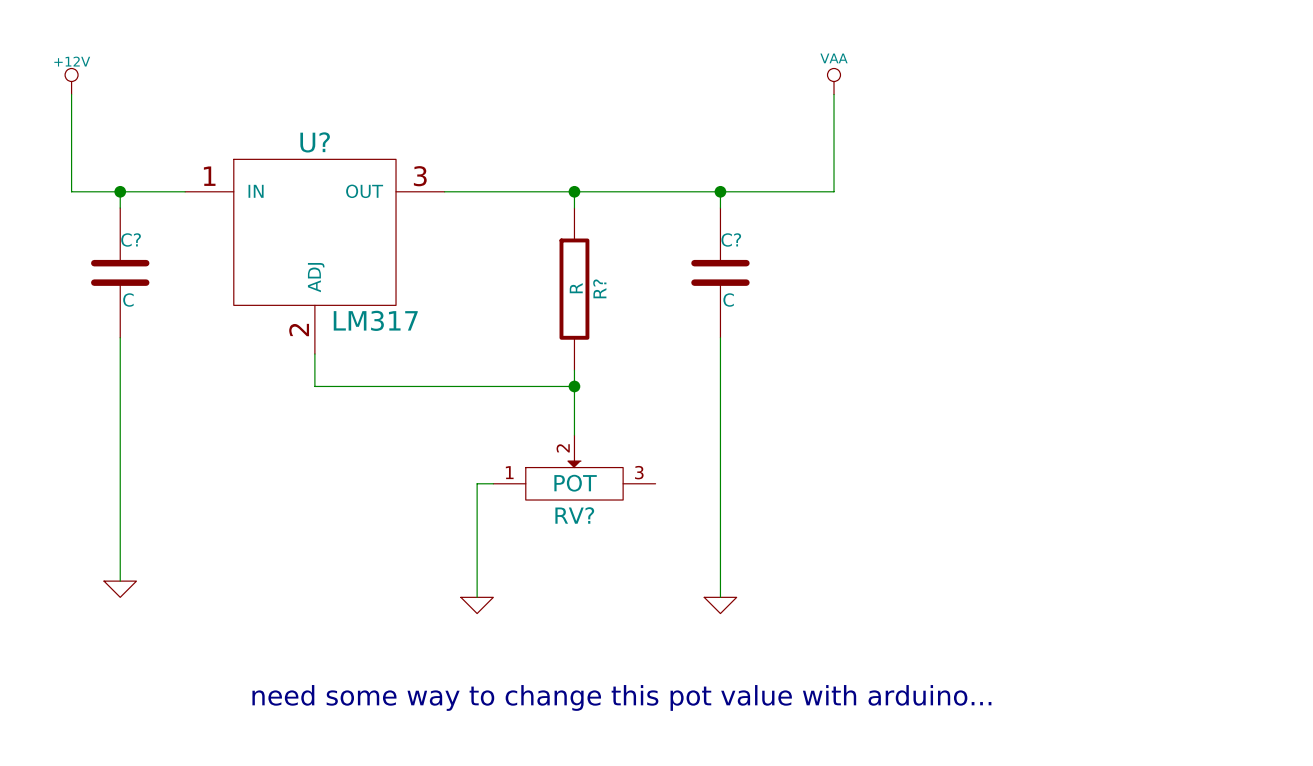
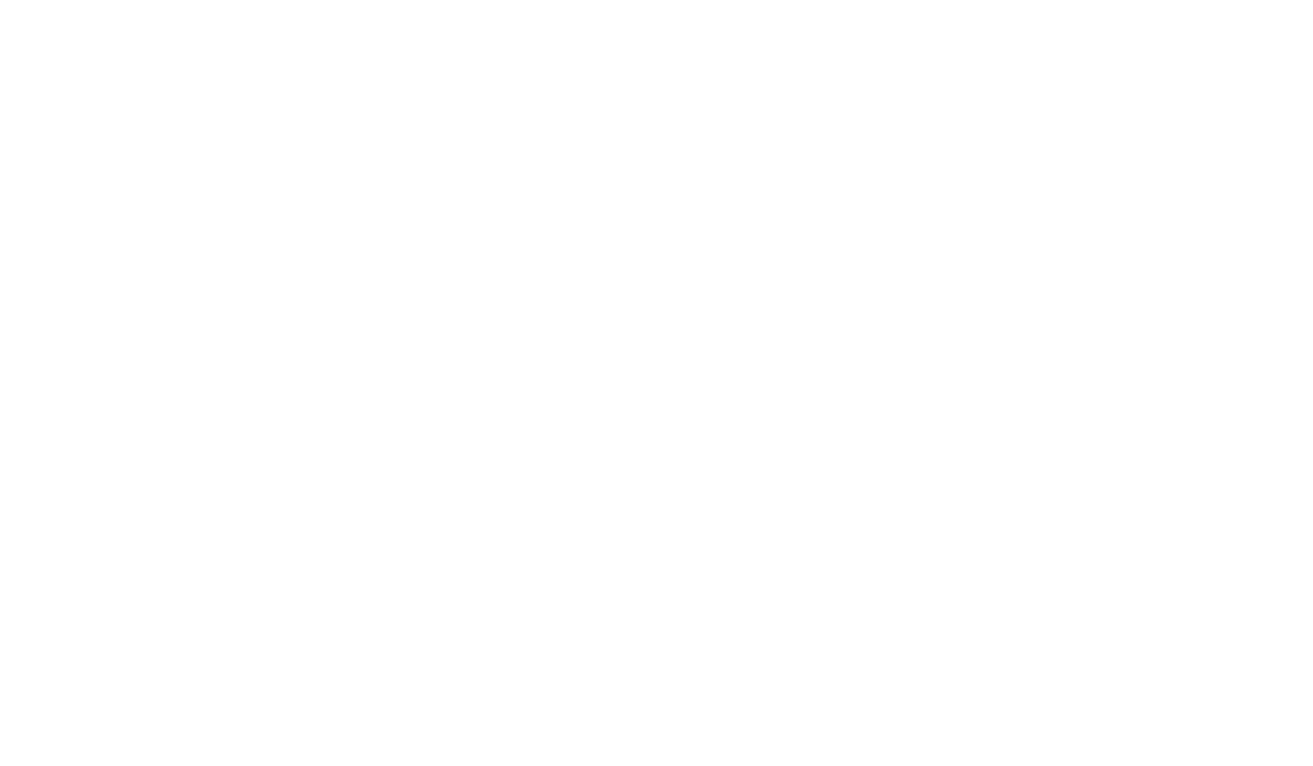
power symbol: +12V (71, 81) -> none
power symbol: VAA (834, 81) -> none
wire: (71, 94) (71, 191) (185, 191) -> none
wire: (834, 94) (834, 191) (444, 191) -> none
wire: (120, 191) (120, 208) -> none
junction: (120, 191) -> none
wire: (574, 191) (574, 208) -> none
junction: (574, 191) -> none
wire: (720, 191) (720, 208) -> none
junction: (720, 191) -> none
U?: LM317 (314, 256) -> none
C?: C (120, 272) -> none
C?: C (720, 272) -> none
R?: R (574, 289) -> none
wire: (120, 337) (120, 581) -> none
wire: (720, 337) (720, 597) -> none
wire: (314, 354) (314, 386) (574, 386) -> none
wire: (574, 370) (574, 435) -> none
junction: (574, 386) -> none
RV?: POT (574, 467) -> none
wire: (493, 483) (477, 483) (477, 597) -> none
power symbol: (120, 589) -> none
power symbol: (477, 605) -> none
power symbol: (720, 605) -> none
text: need some way to change this pot value with arduino... (621, 697) -> none

